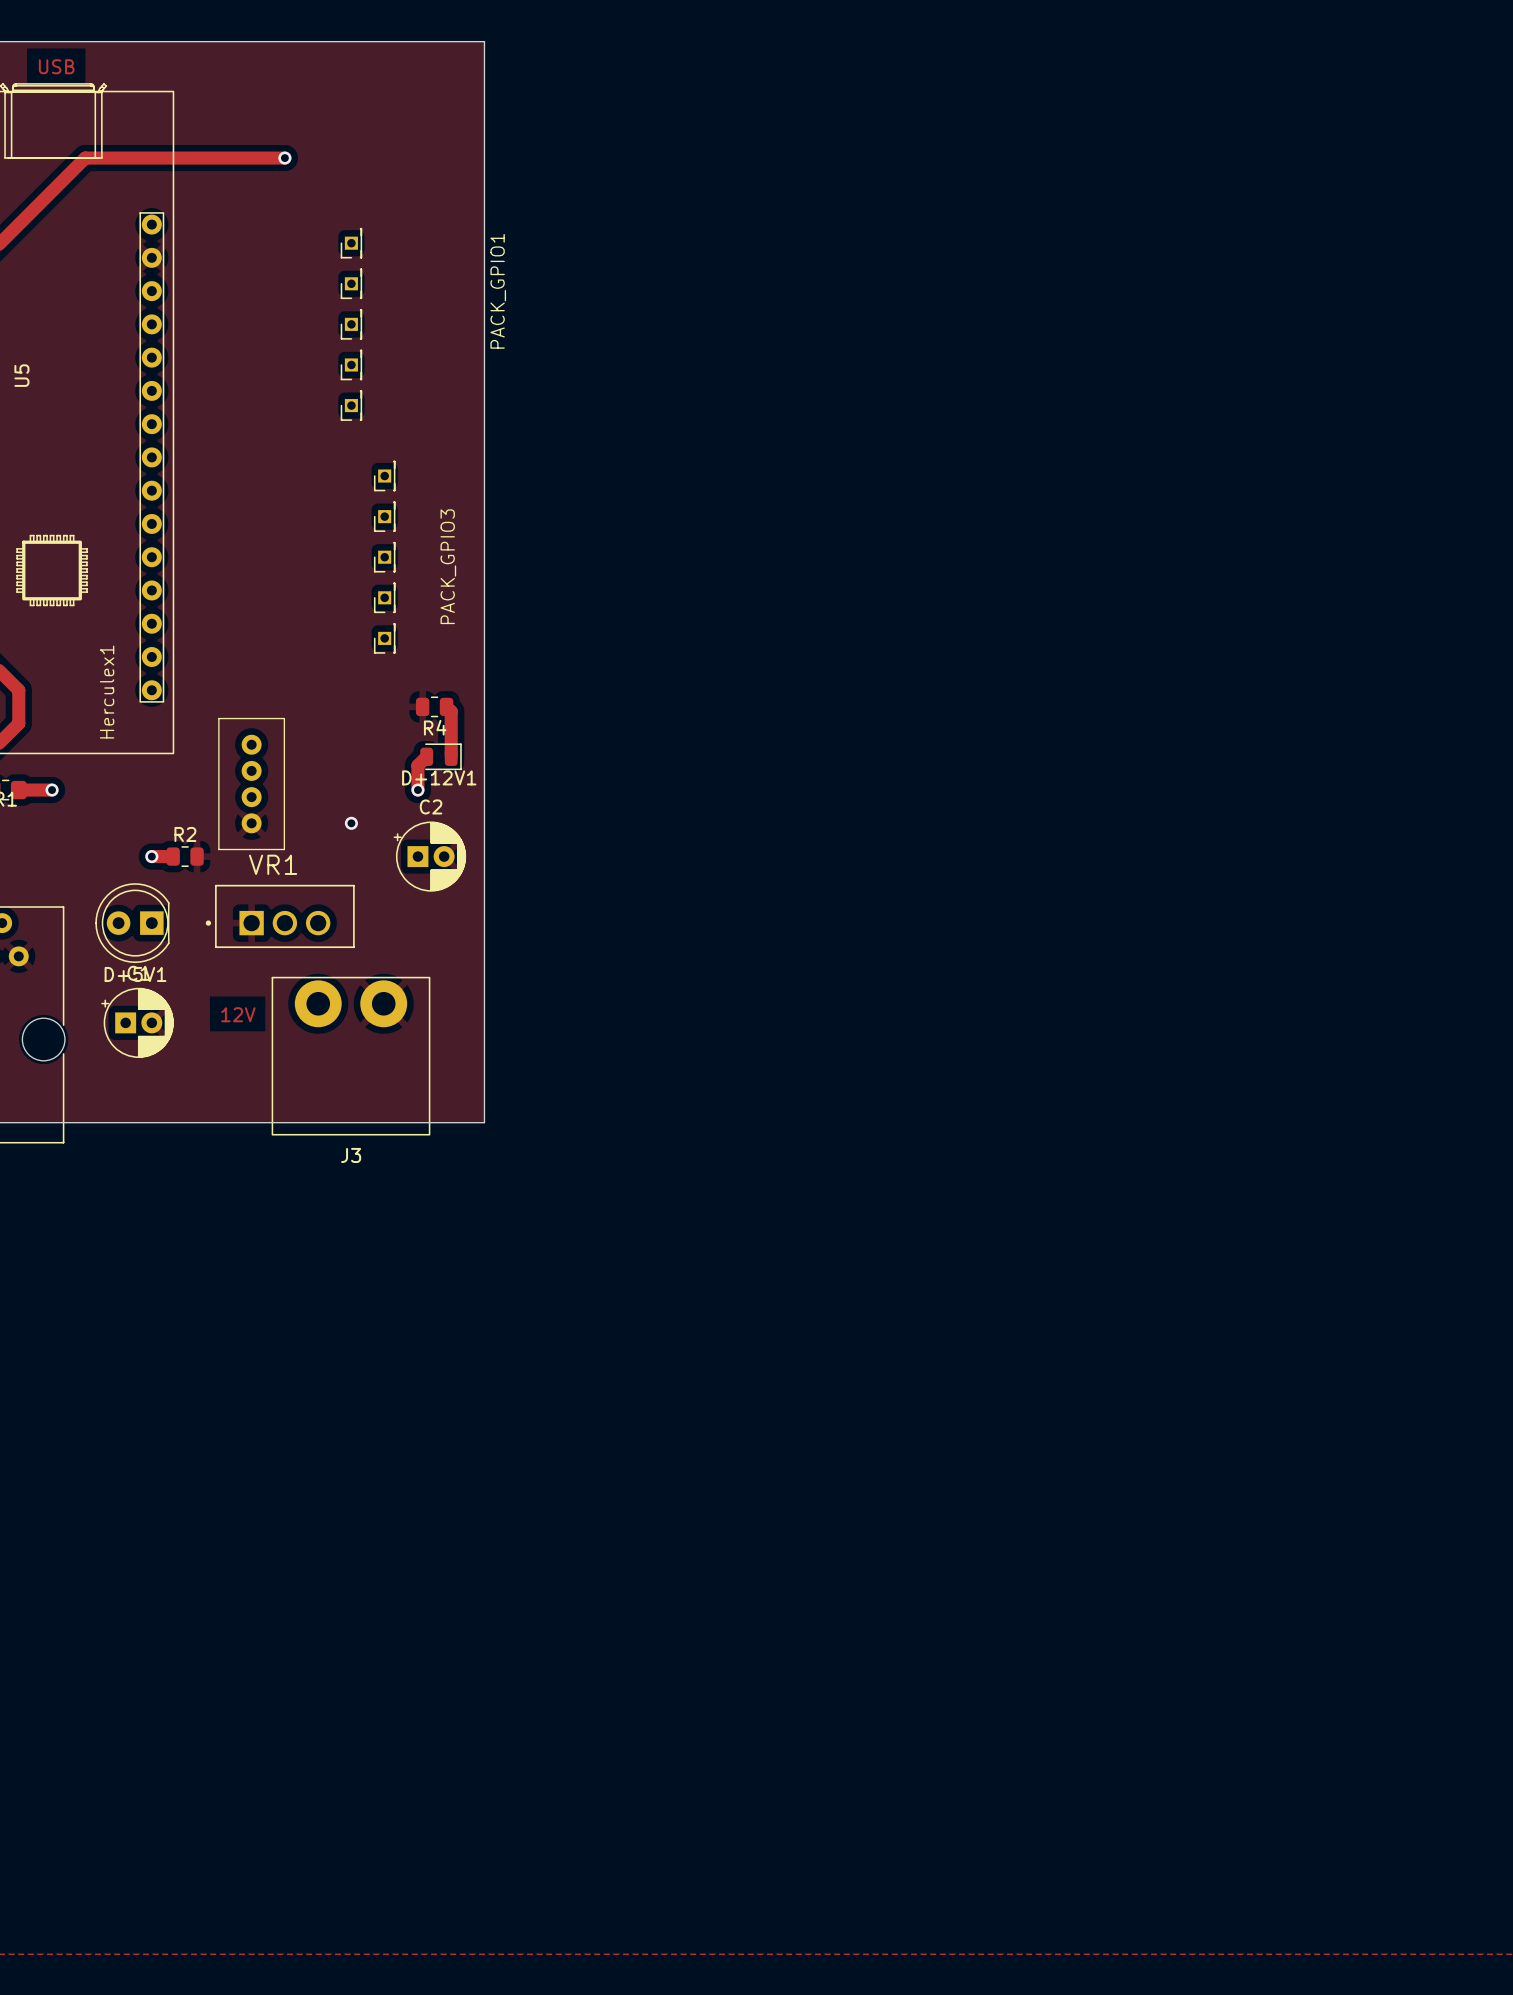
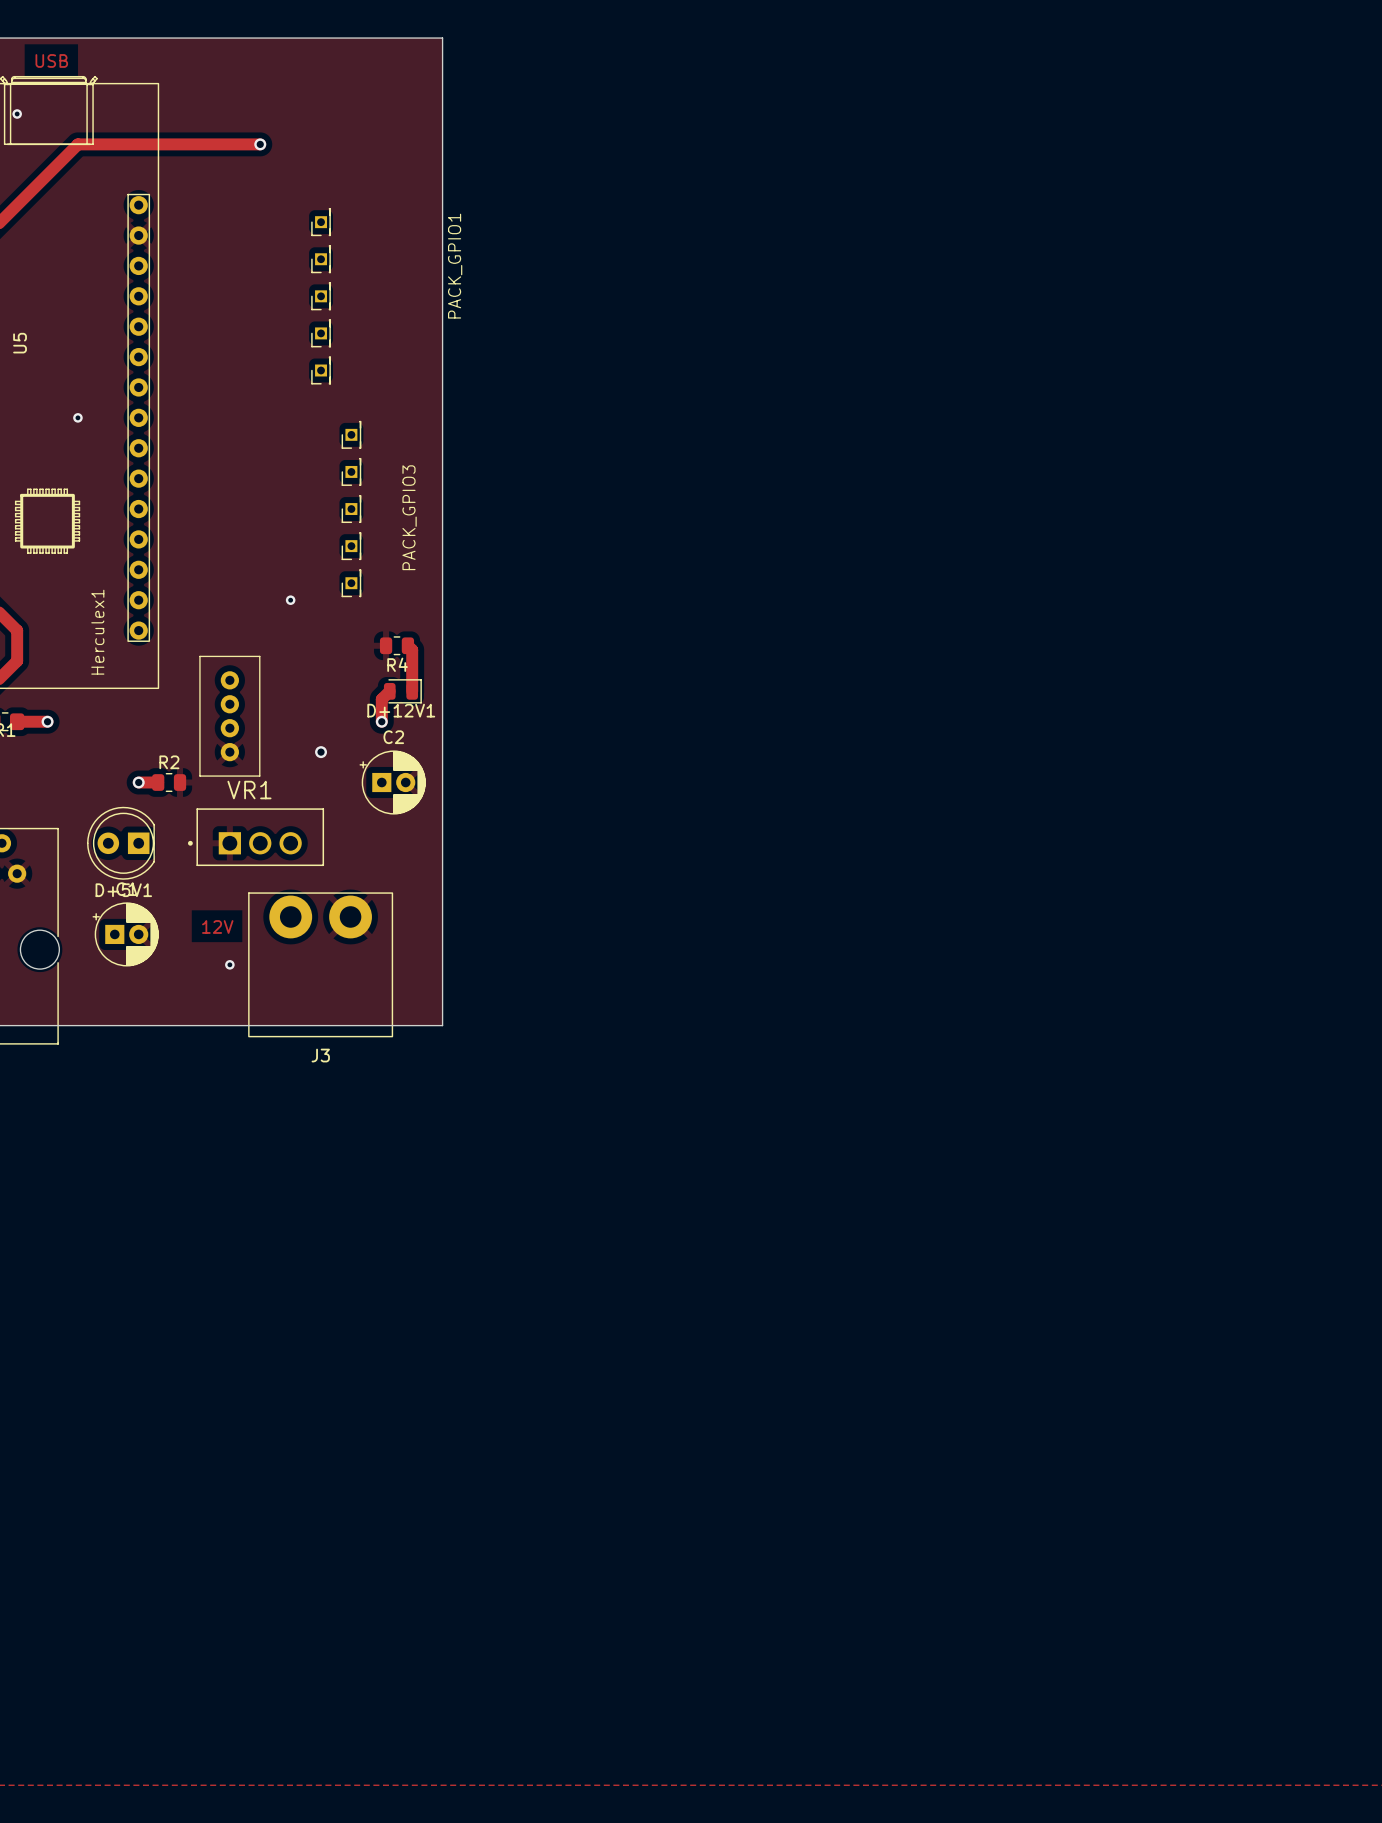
via: none -> (17, 114)
via: none -> (77, 417)
via: none -> (290, 600)
via: none -> (229, 964)

